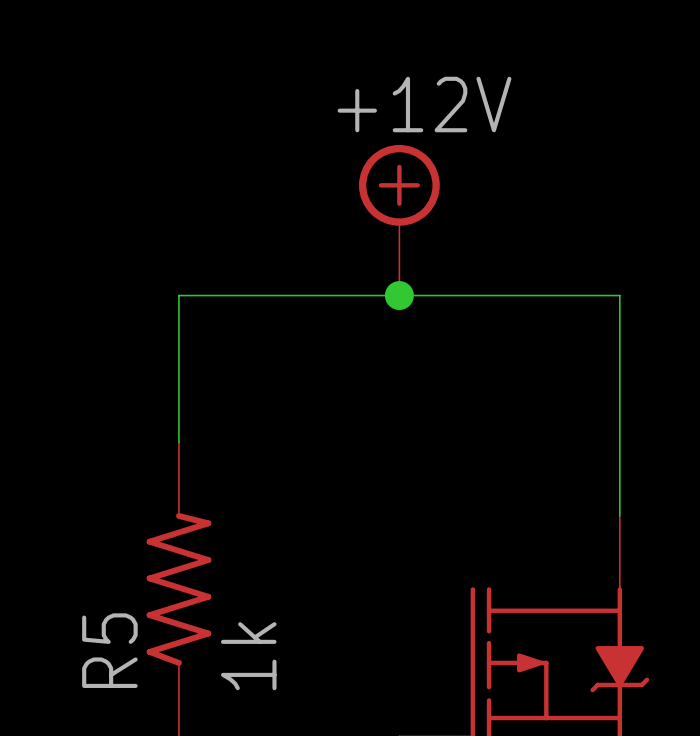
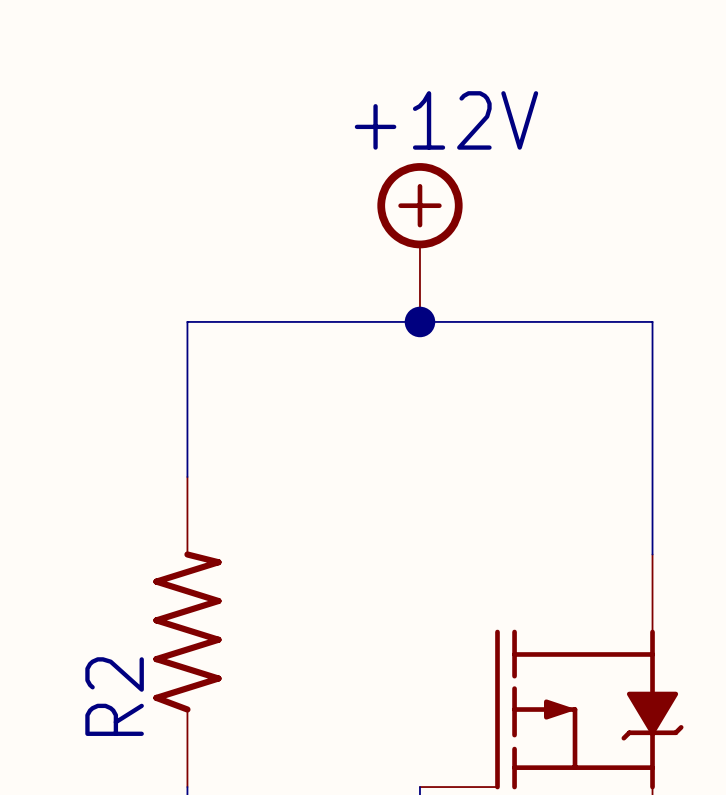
R5 name: R5 (109, 650) -> R2 (114, 696)
R5 value: 1k (248, 656) -> none

